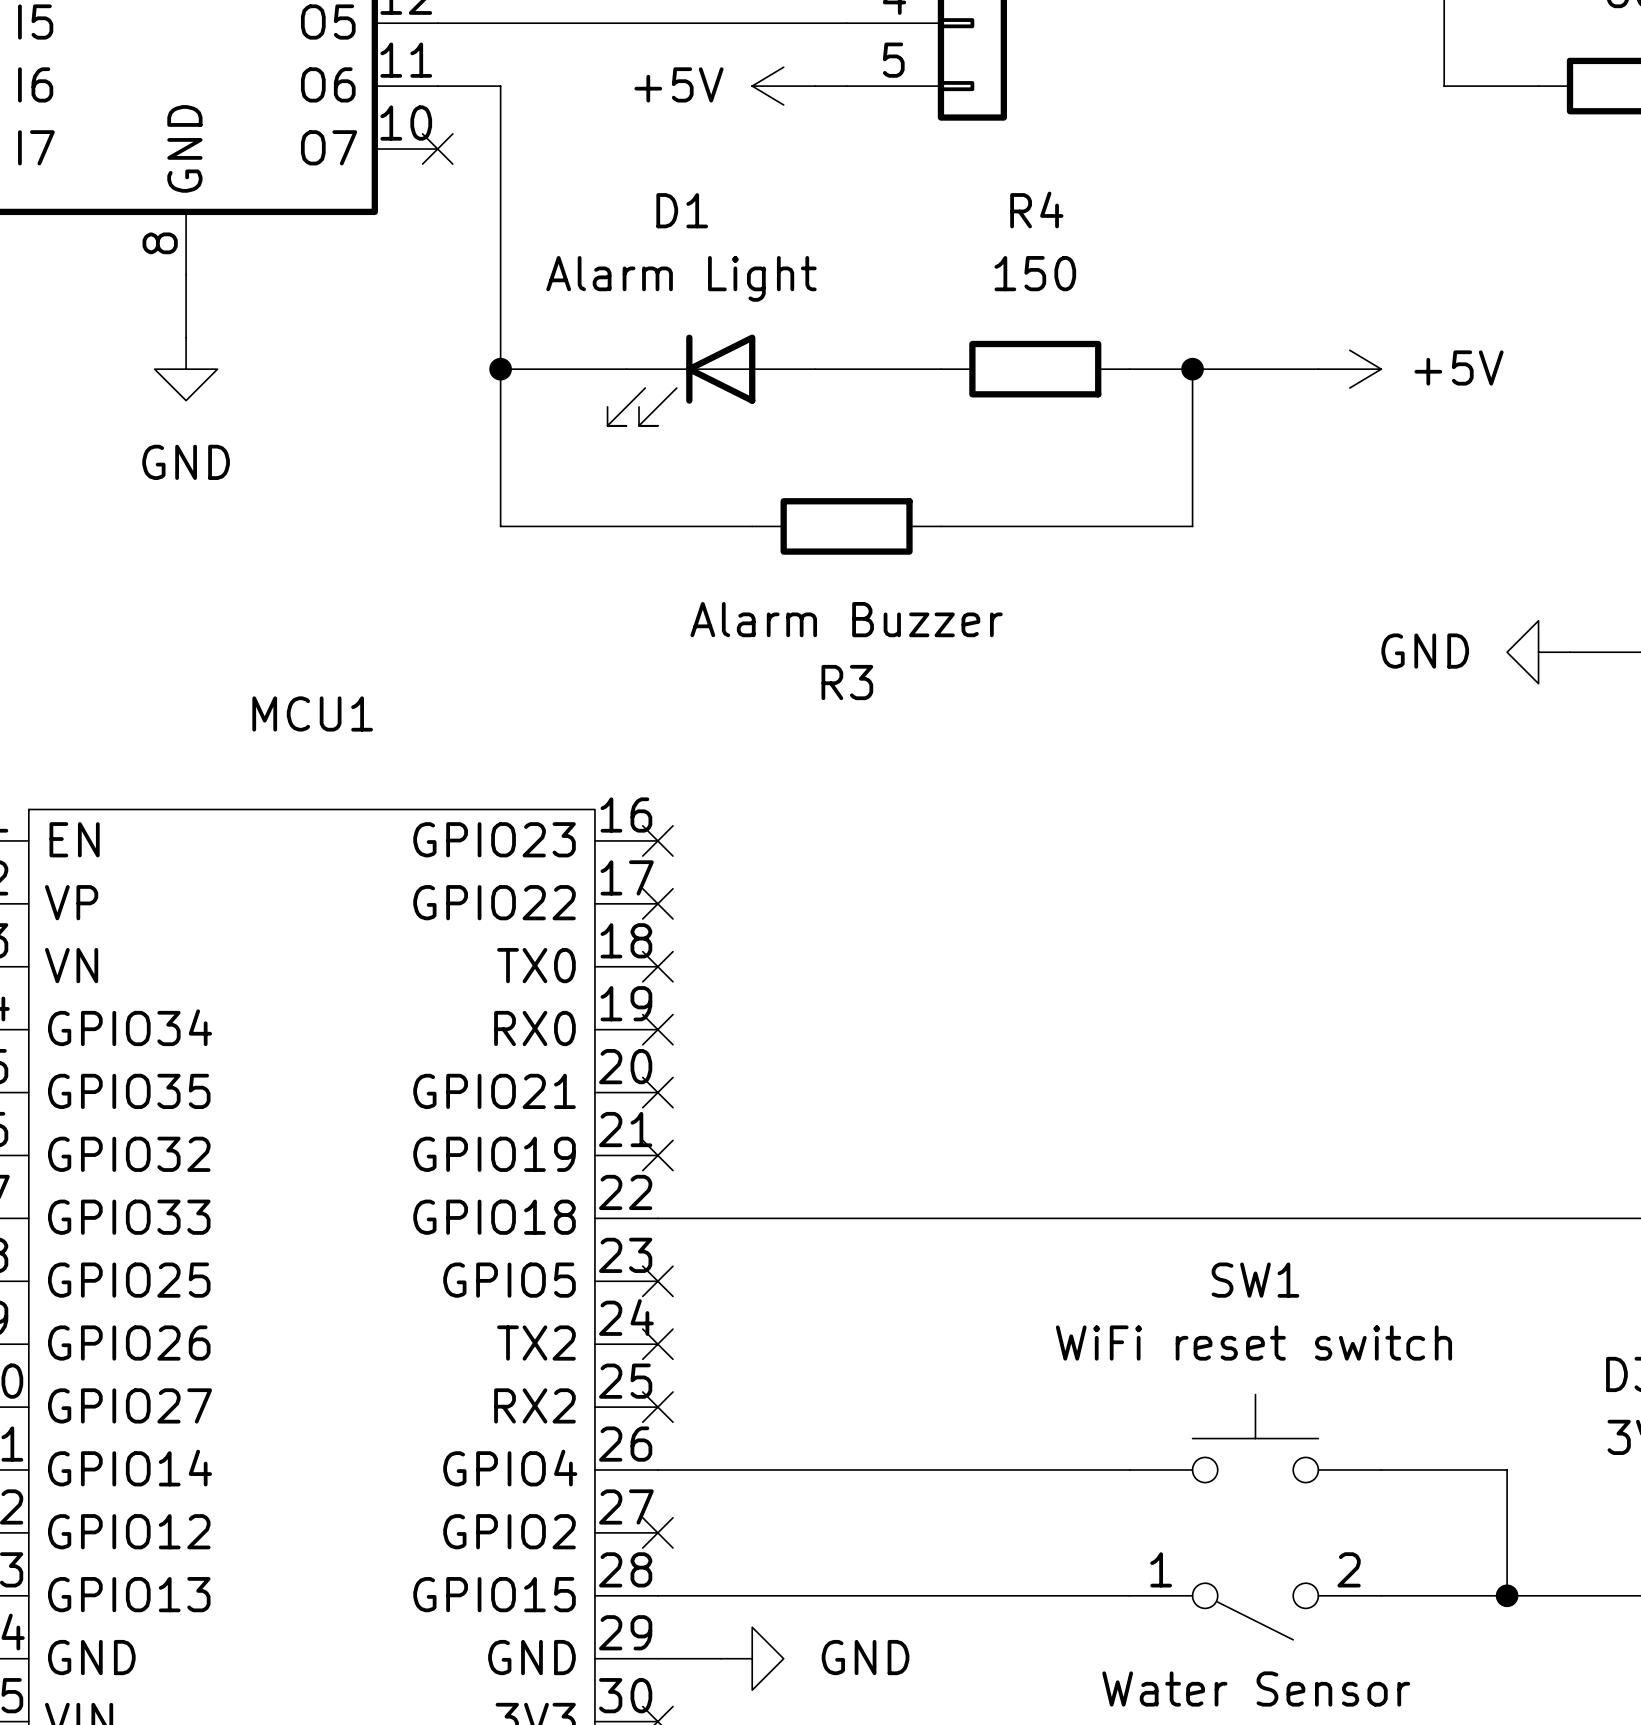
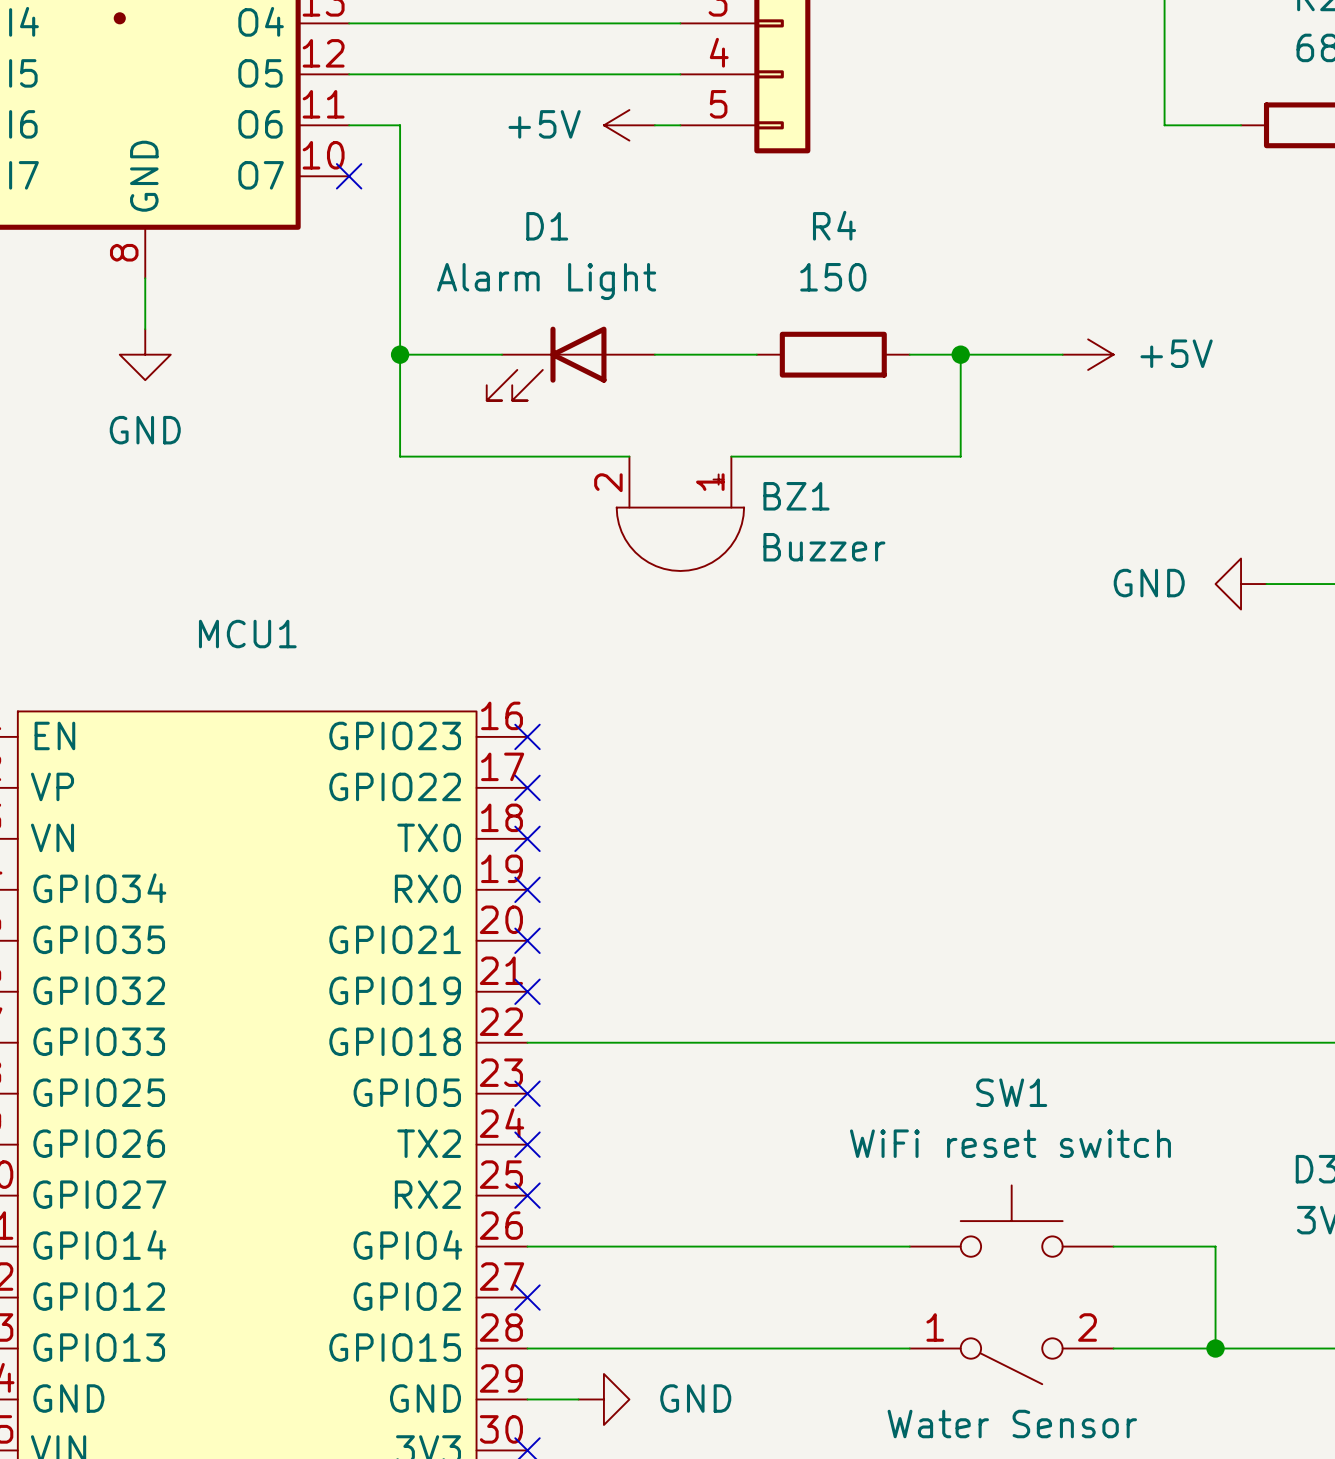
wire: (500, 494) (500, 526) (752, 526) -> (400, 456) (629, 456)
wire: (1192, 494) (1192, 526) (940, 526) -> (960, 456) (731, 456)
R3: Alarm Buzzer (846, 526) -> none
BZ1: none -> Buzzer (680, 513)

